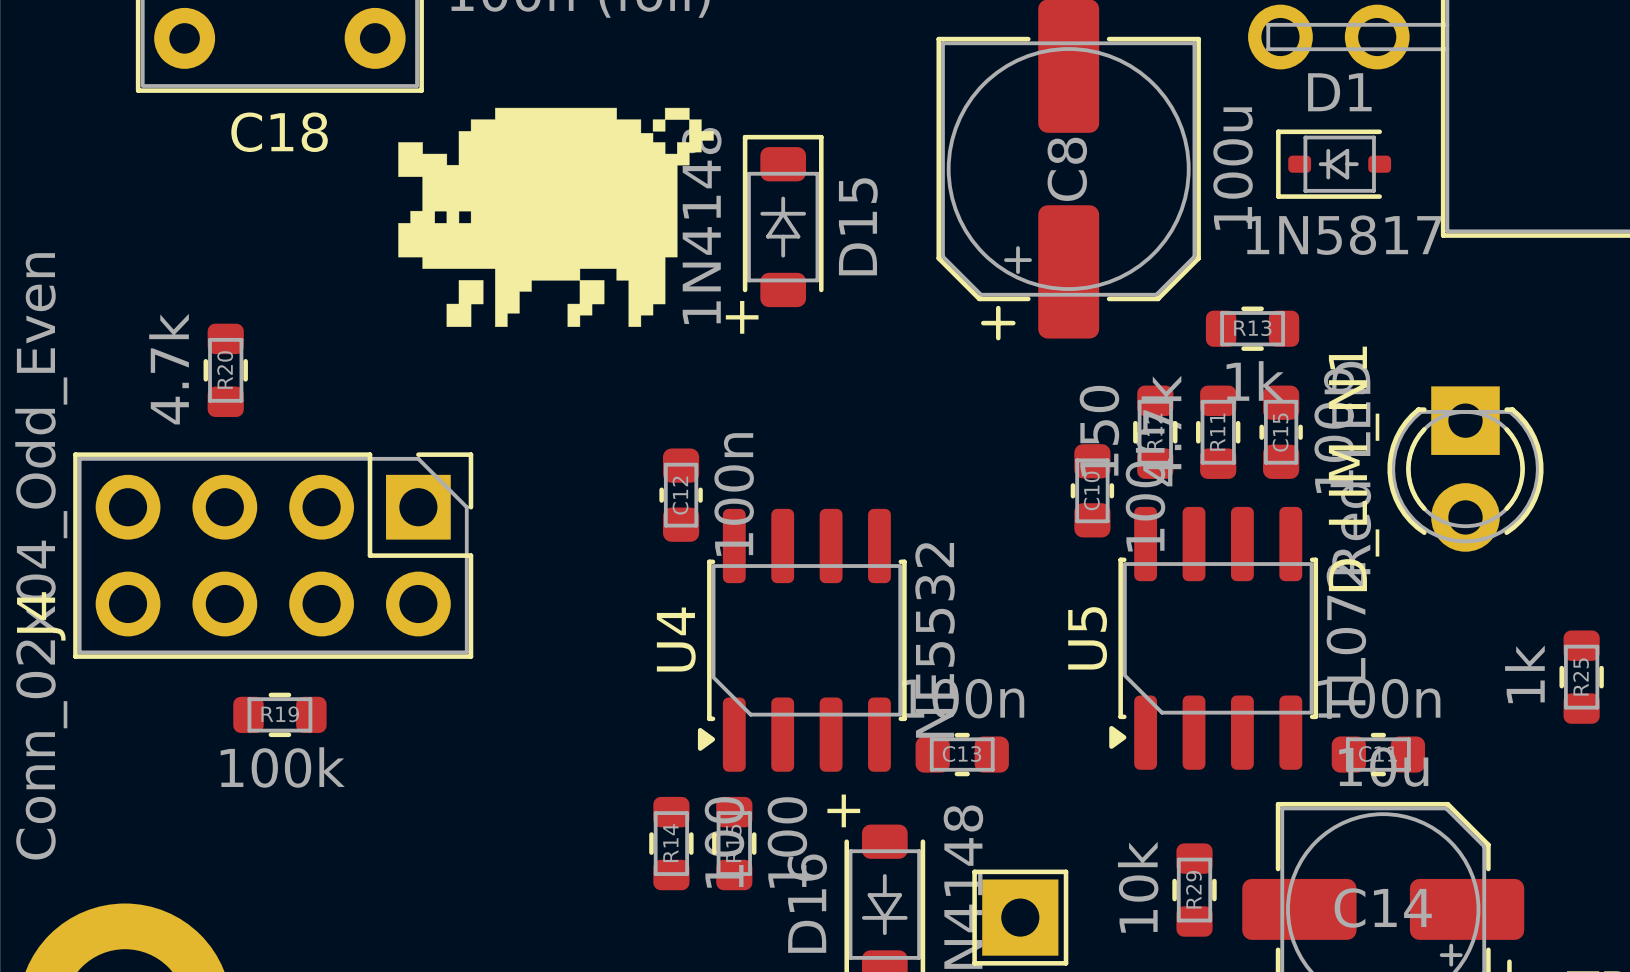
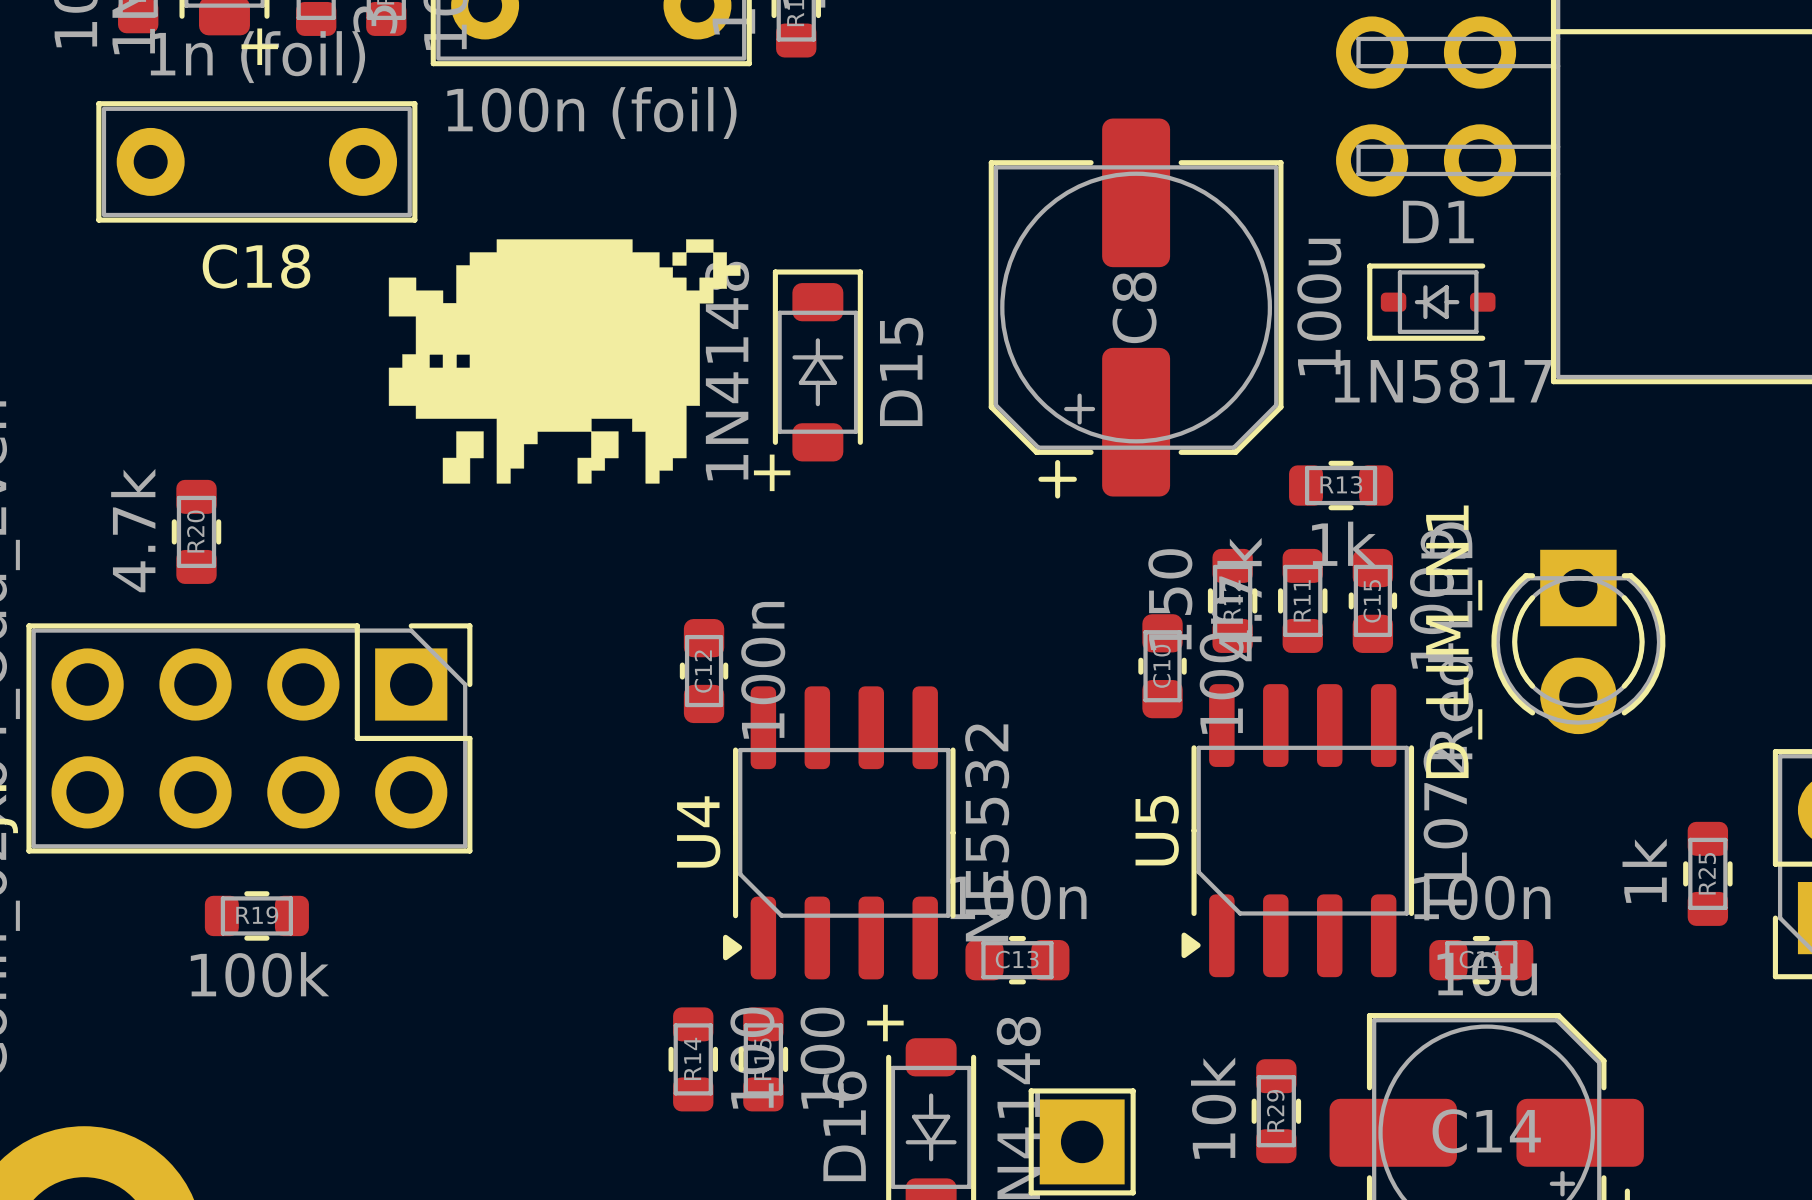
U5 footprint: [1109, 506, 1319, 770] -> [1181, 684, 1415, 978]
U4 footprint: [697, 508, 907, 772] -> [723, 686, 956, 980]

